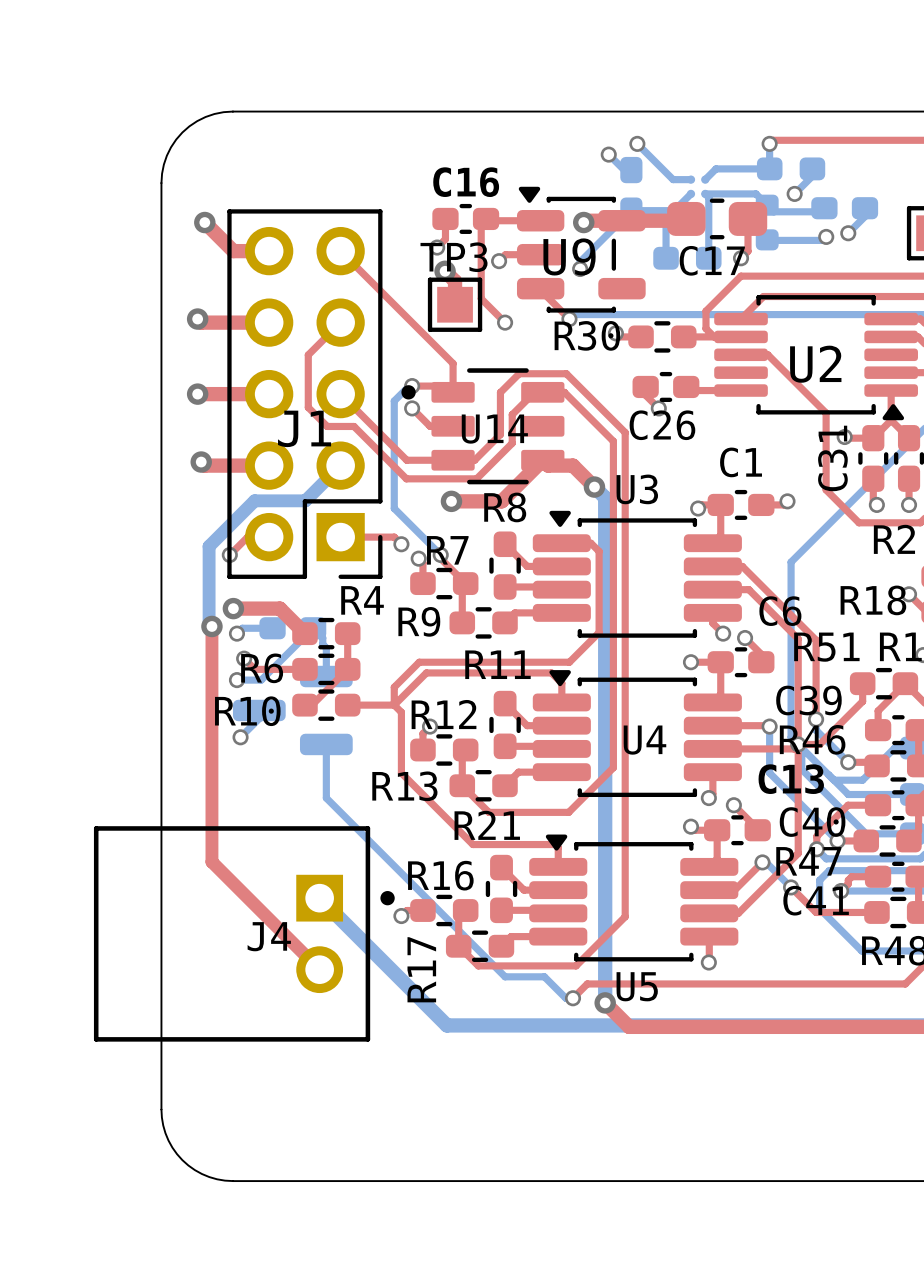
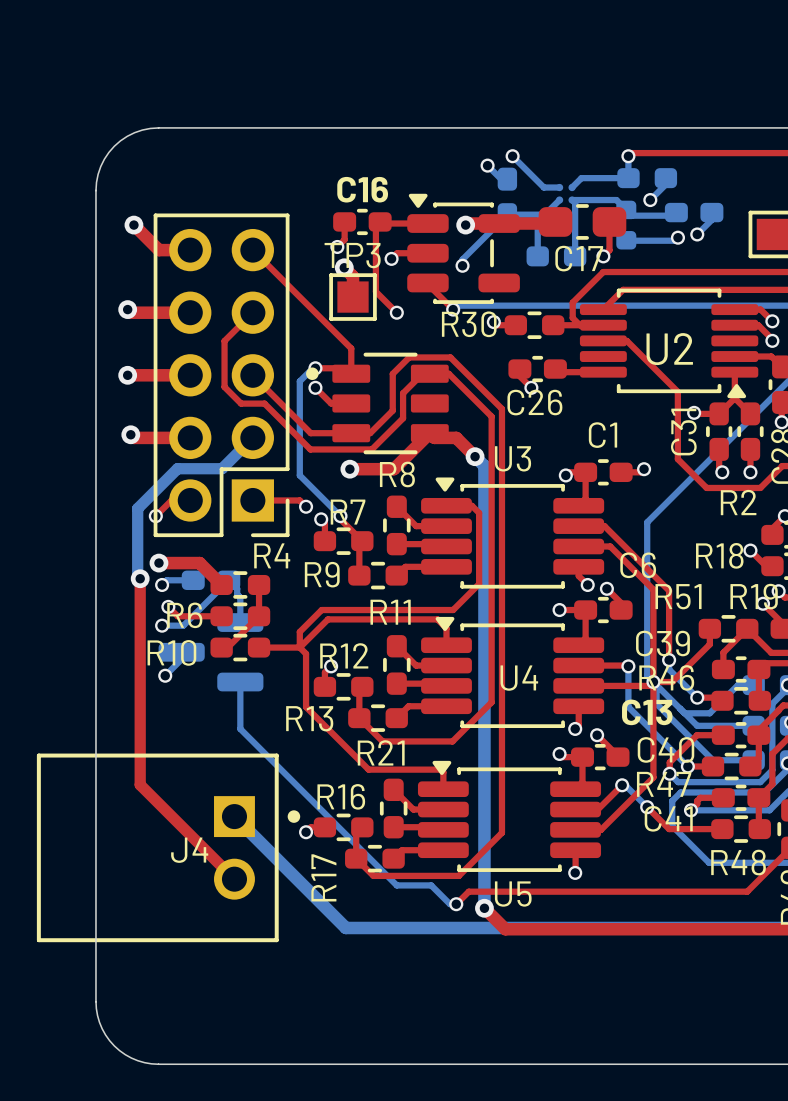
U9 name: U9 (569, 256) -> none
J1 name: J1 (304, 428) -> none
U14 name: U14 (494, 429) -> none

